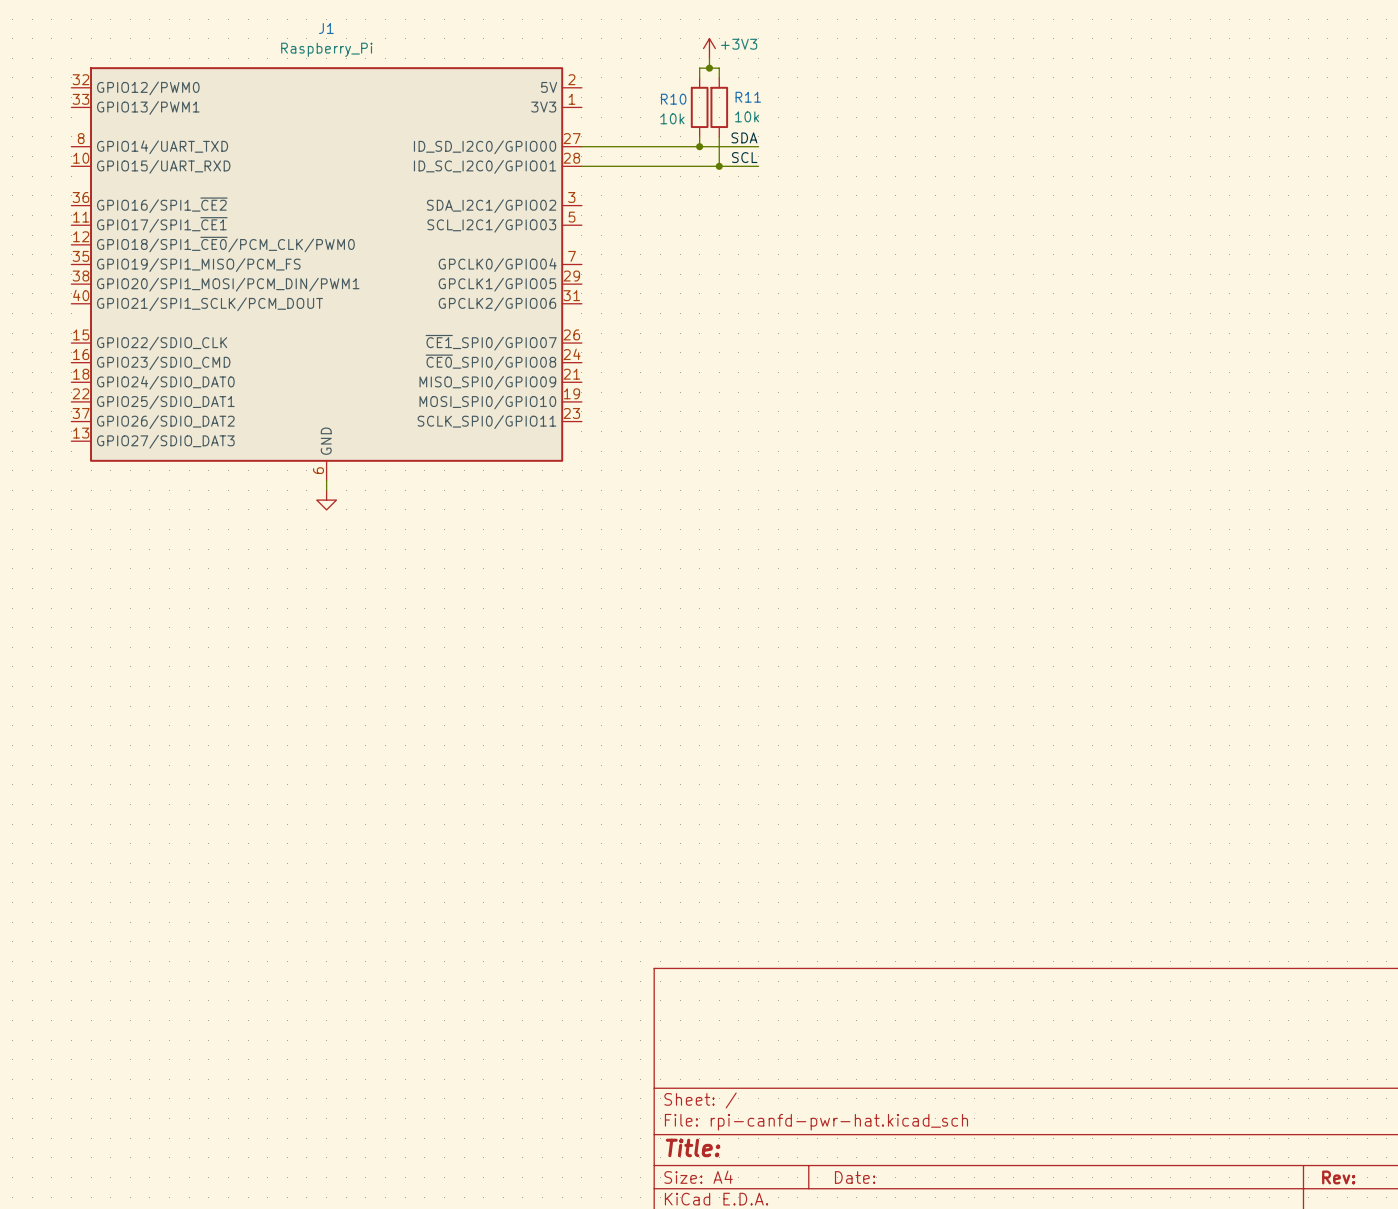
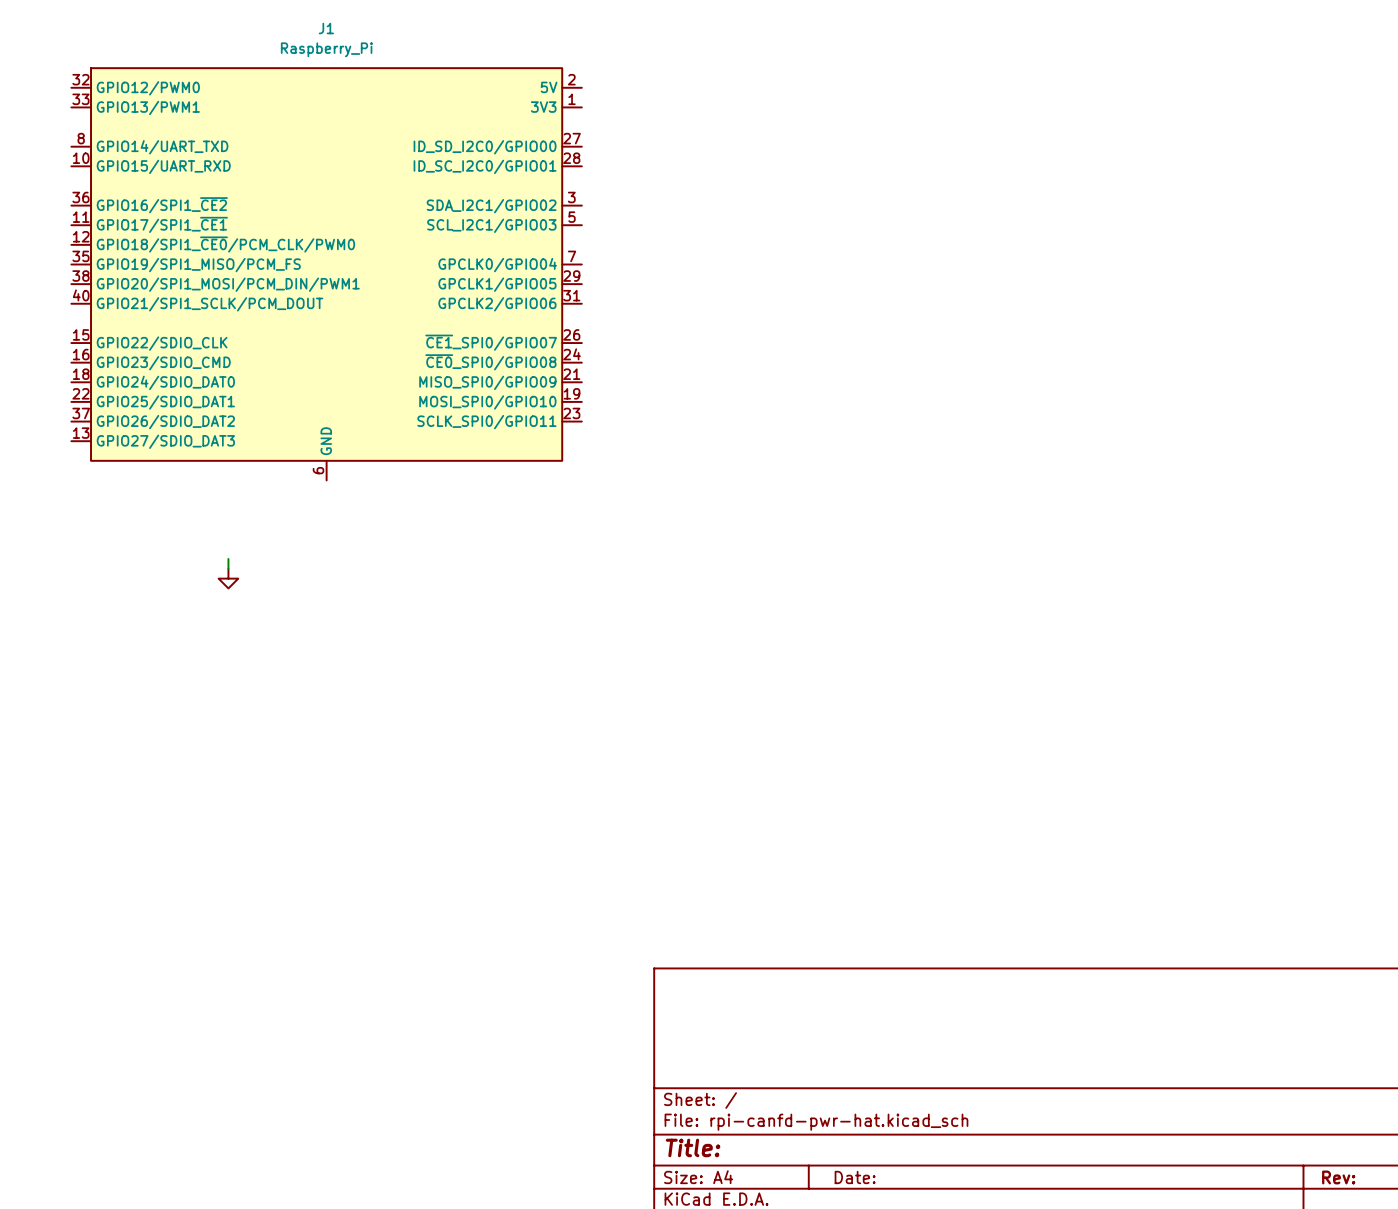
power symbol: +3V3 (709, 48) -> none
wire: (709, 58) (709, 68) -> none
junction: (709, 68) -> none
wire: (699, 77) (699, 68) (719, 68) (719, 77) -> none
R10: 10k (699, 107) -> none
R11: 10k (719, 107) -> none
wire: (699, 136) (699, 146) -> none
wire: (719, 136) (719, 166) -> none
label: SDA (744, 137) -> none
wire: (581, 146) (758, 146) -> none
junction: (699, 146) -> none
label: SCL (744, 157) -> none
wire: (581, 166) (758, 166) -> none
junction: (719, 166) -> none
wire: (326, 480) (326, 490) -> (228, 558) (228, 568)
power symbol position: (326, 500) -> (228, 578)

